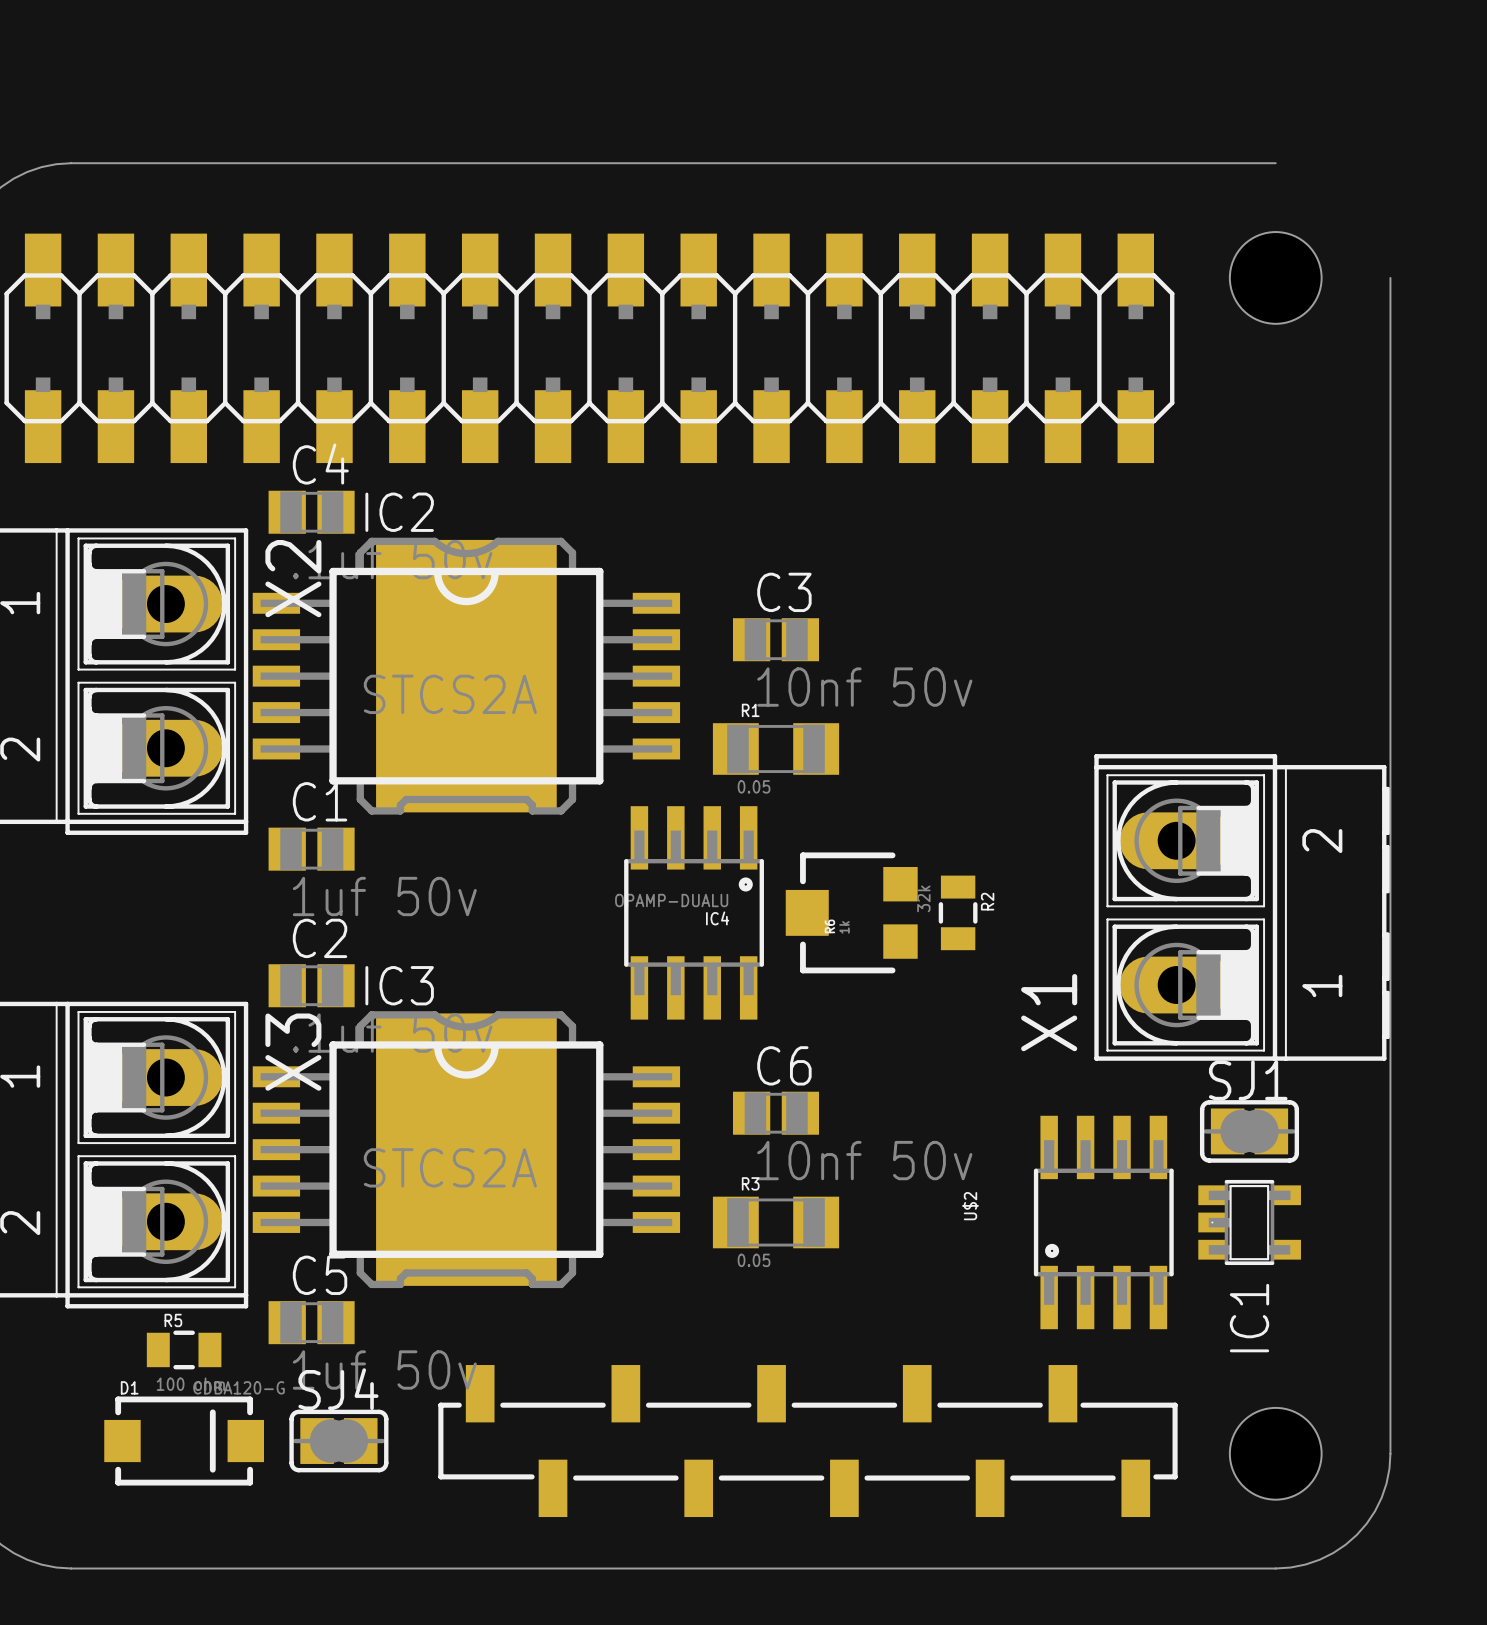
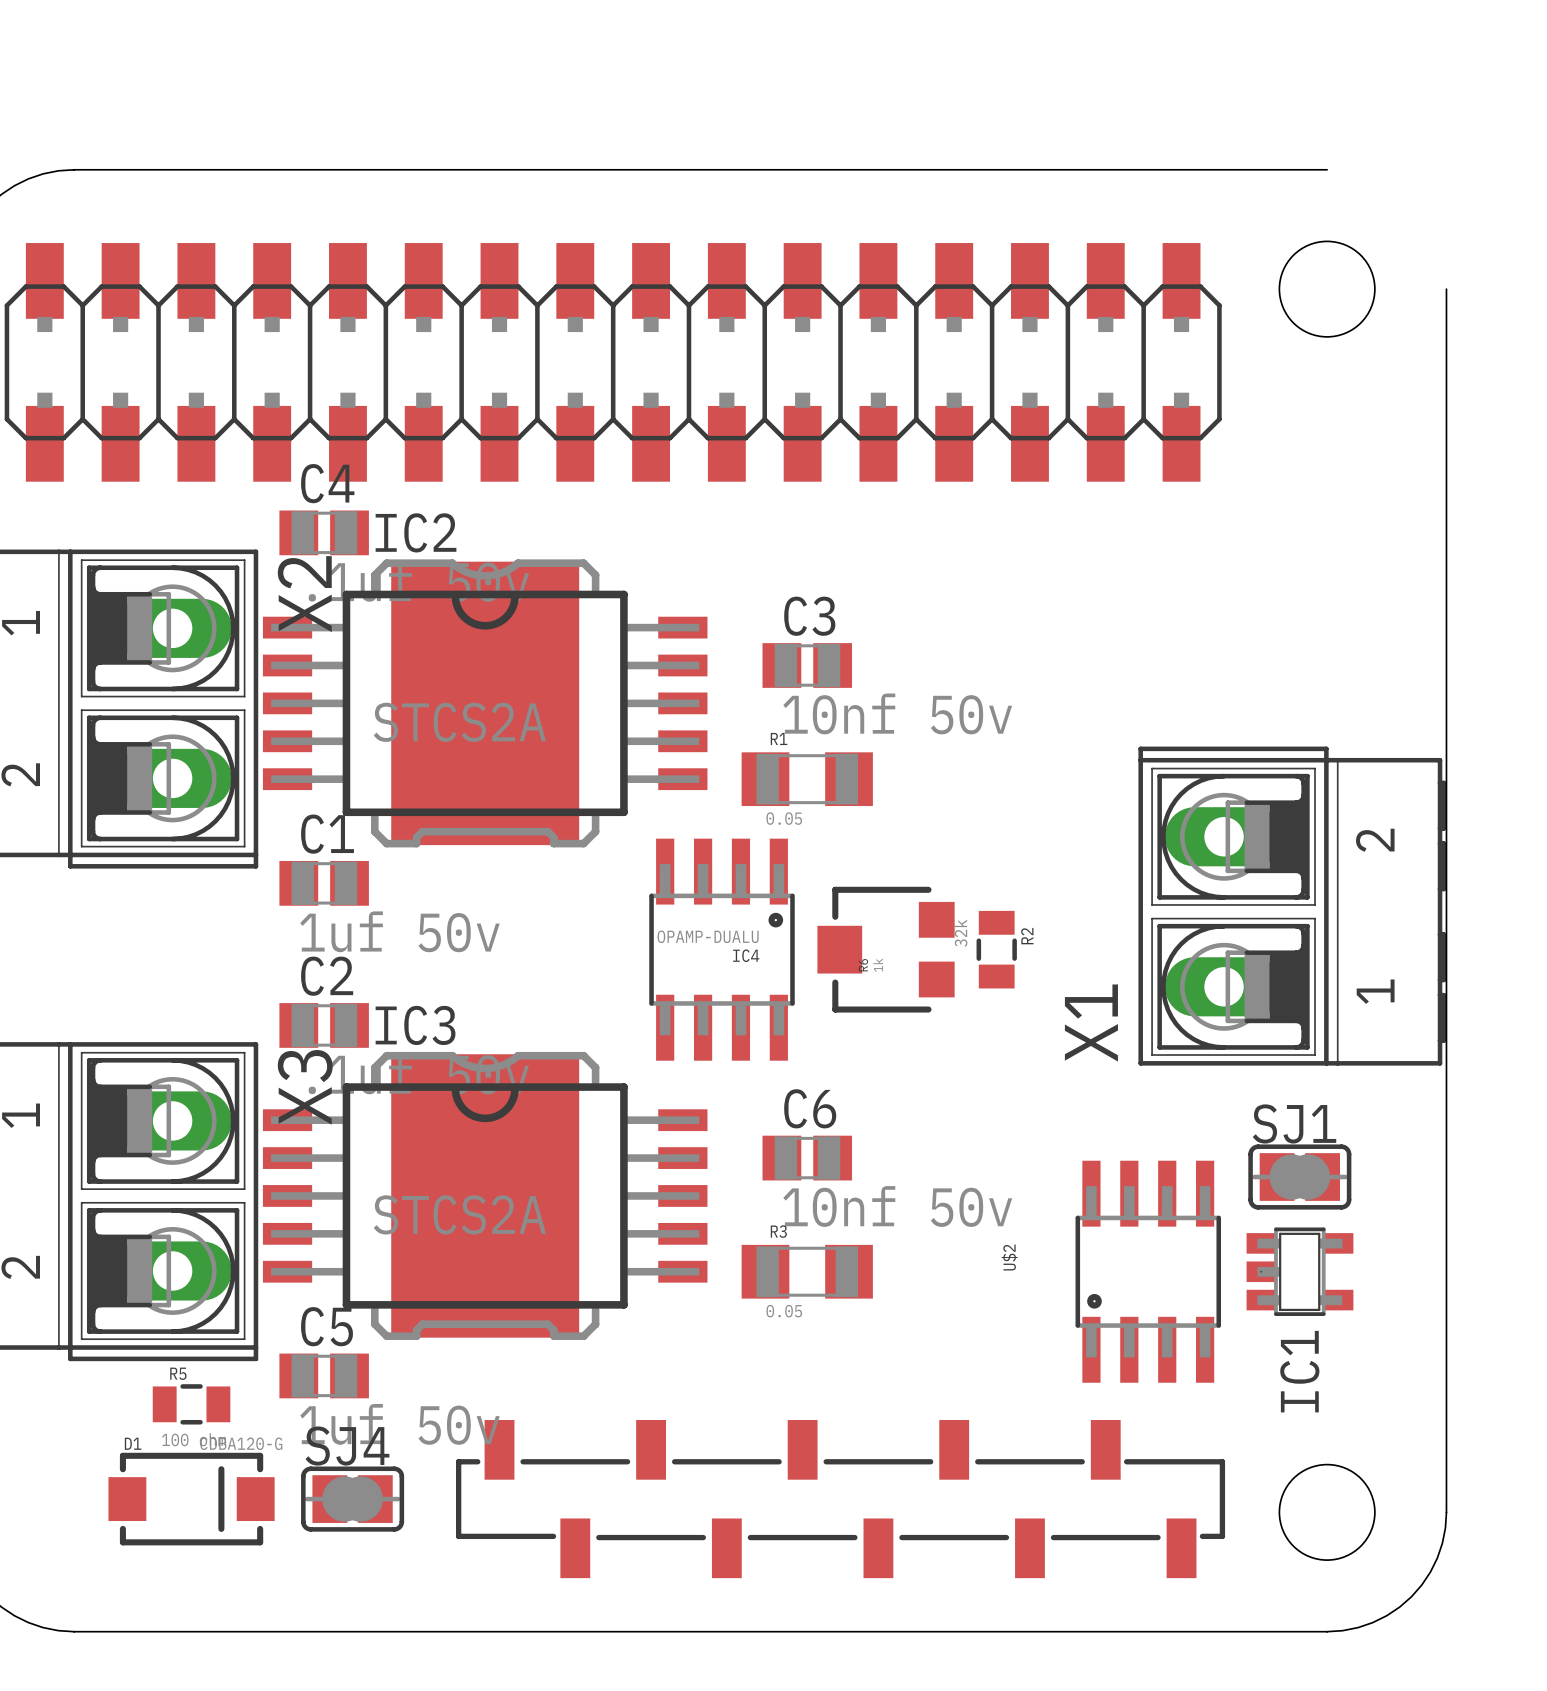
X1 position: (1242, 907) -> (1292, 906)

